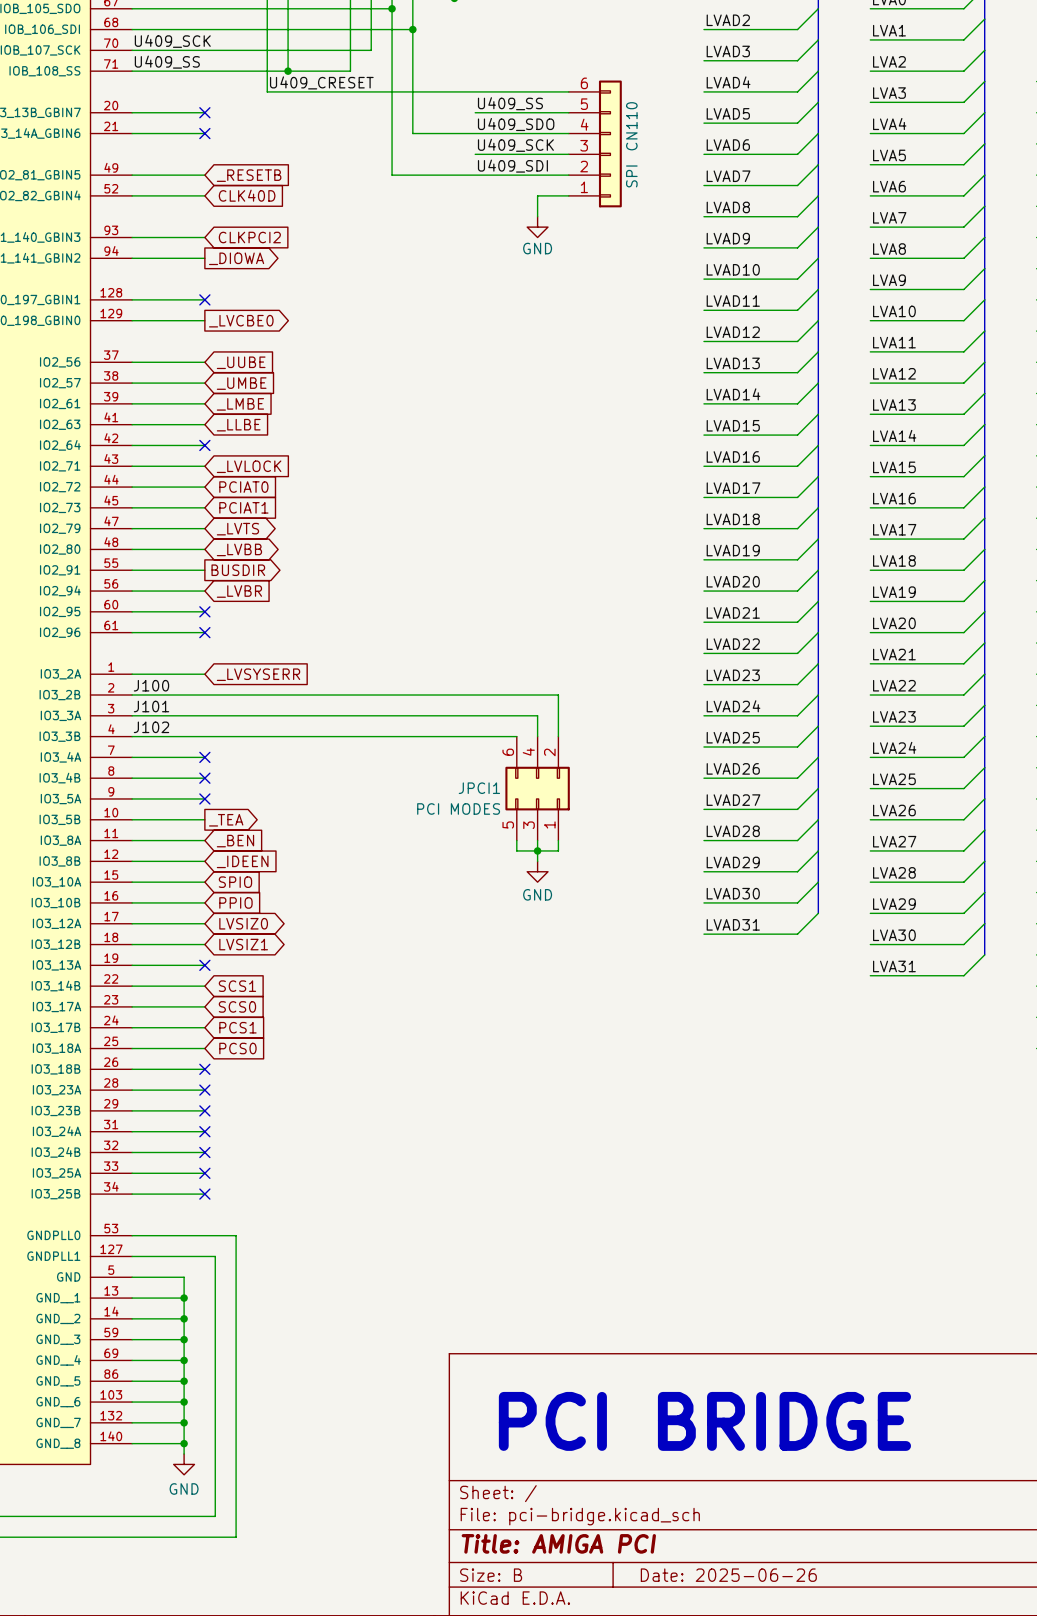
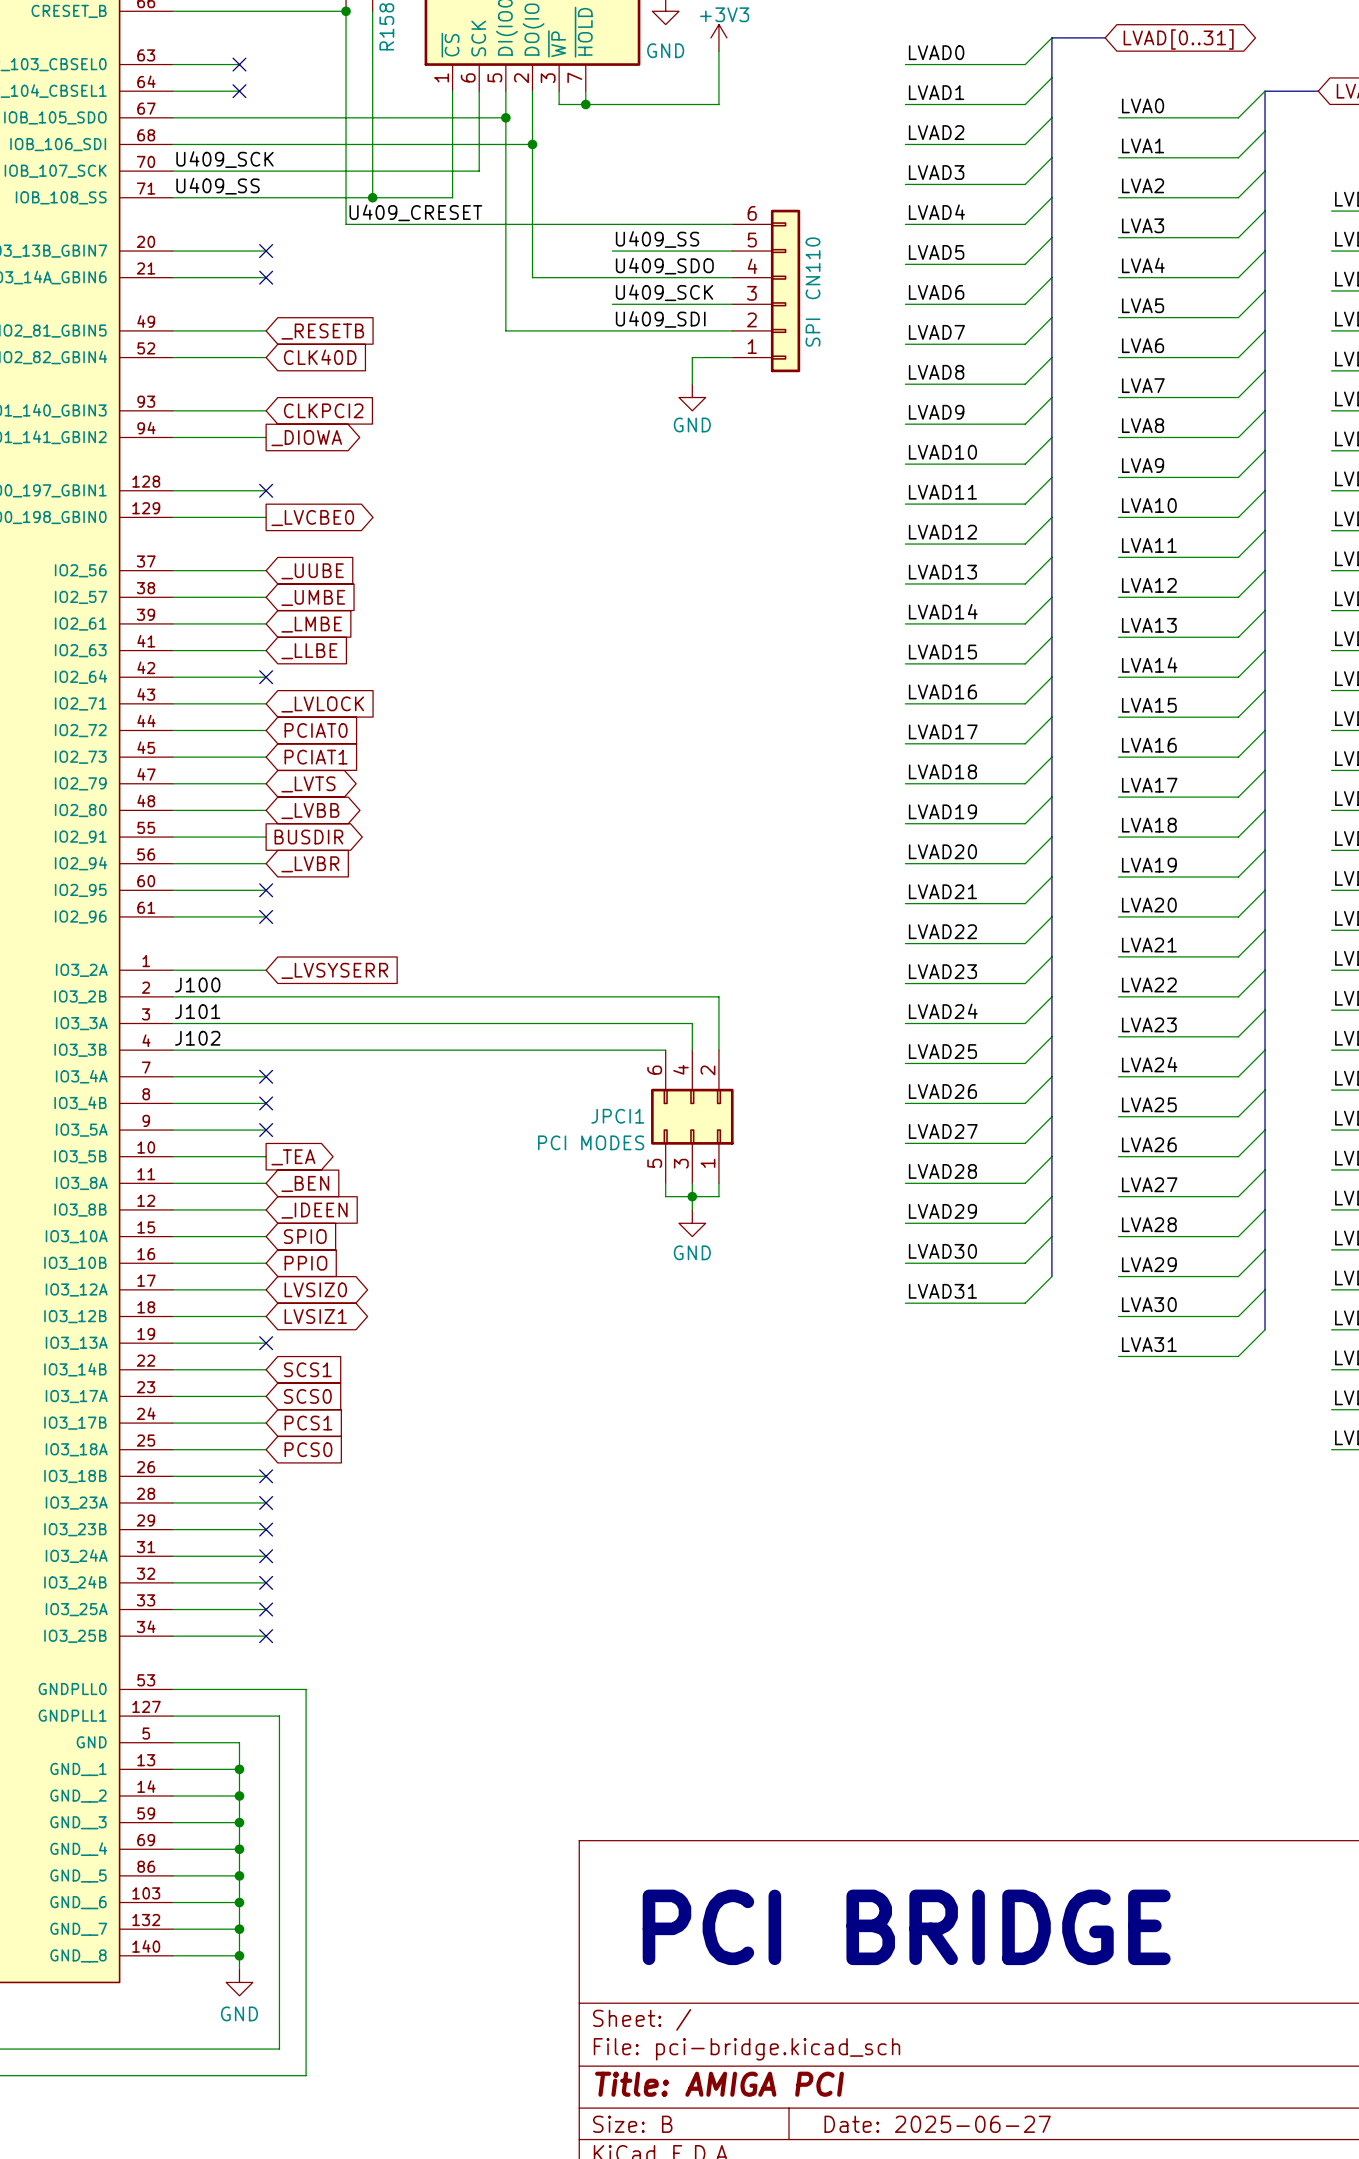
title block: Date: 2025-06-26 (728, 1575) -> Date: 2025-06-27 (937, 2124)

